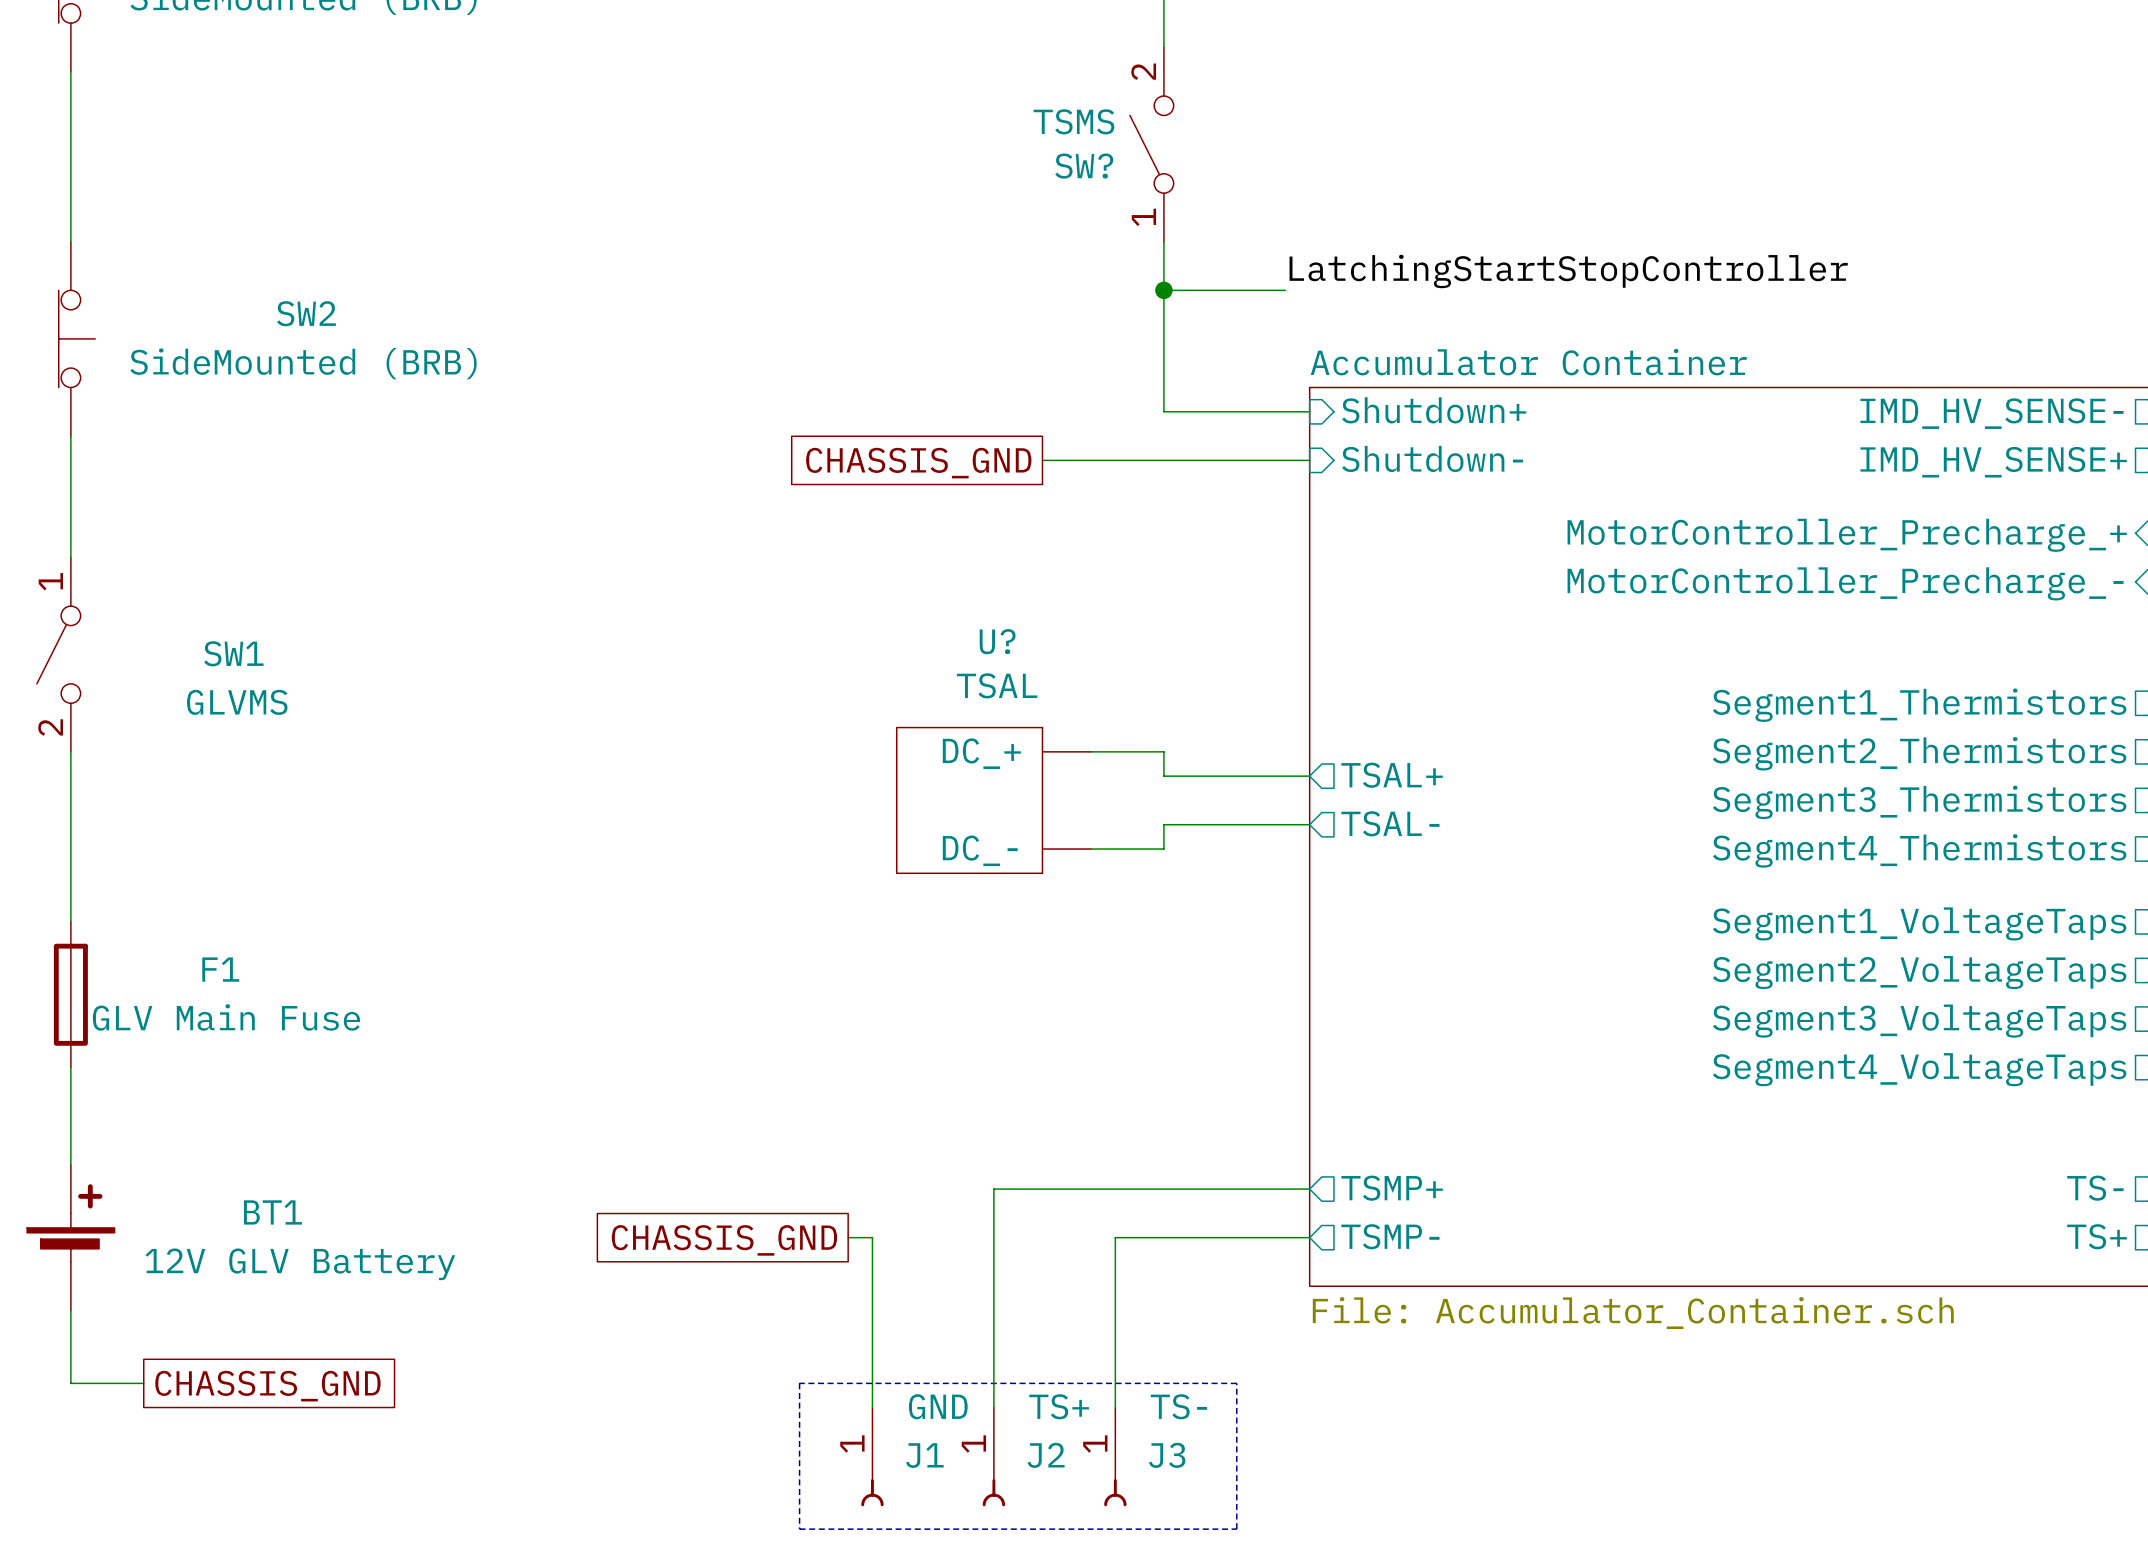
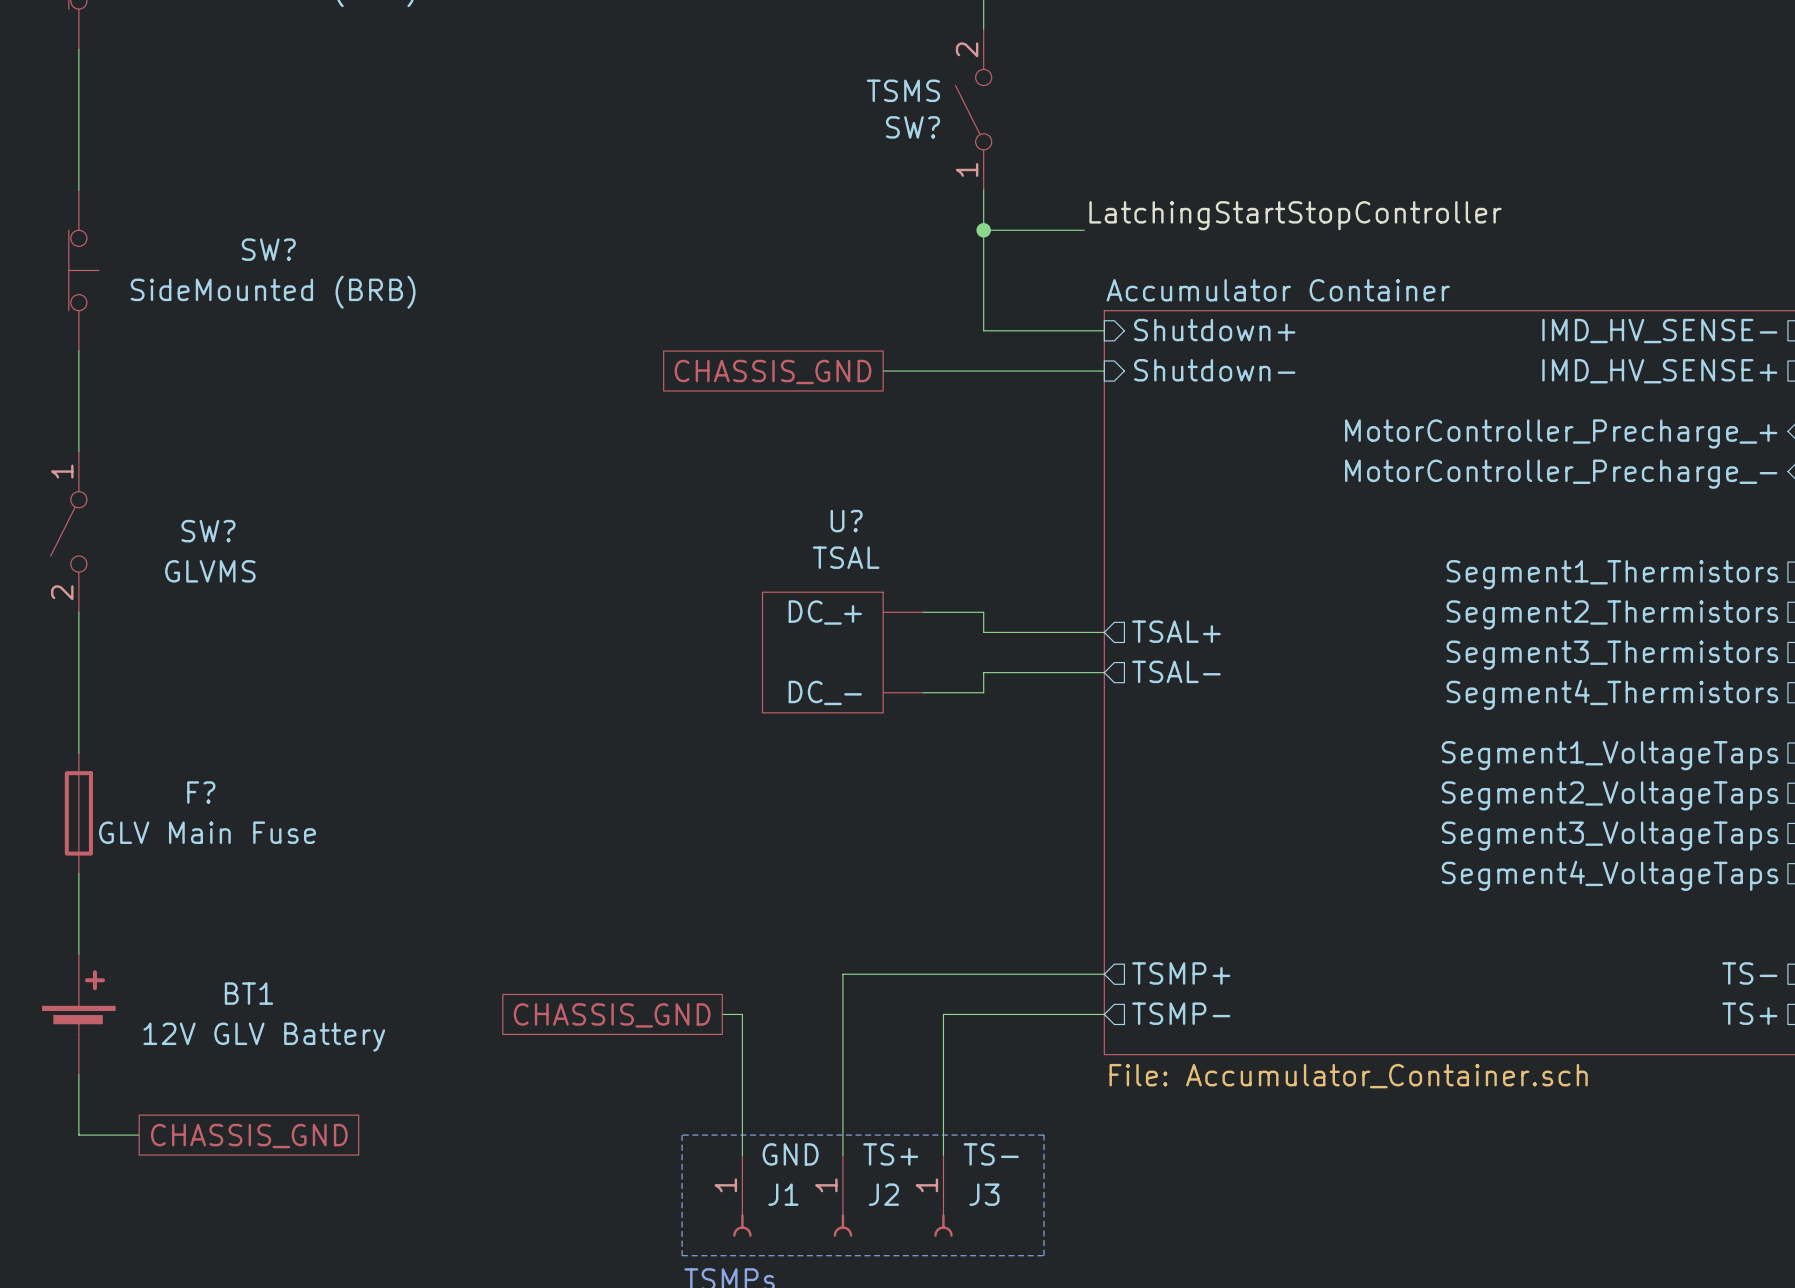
SW2 name: SW2 (306, 313) -> SW? (268, 249)
SW1 name: SW1 (233, 653) -> SW? (208, 531)
F1 name: F1 (220, 969) -> F? (201, 792)

